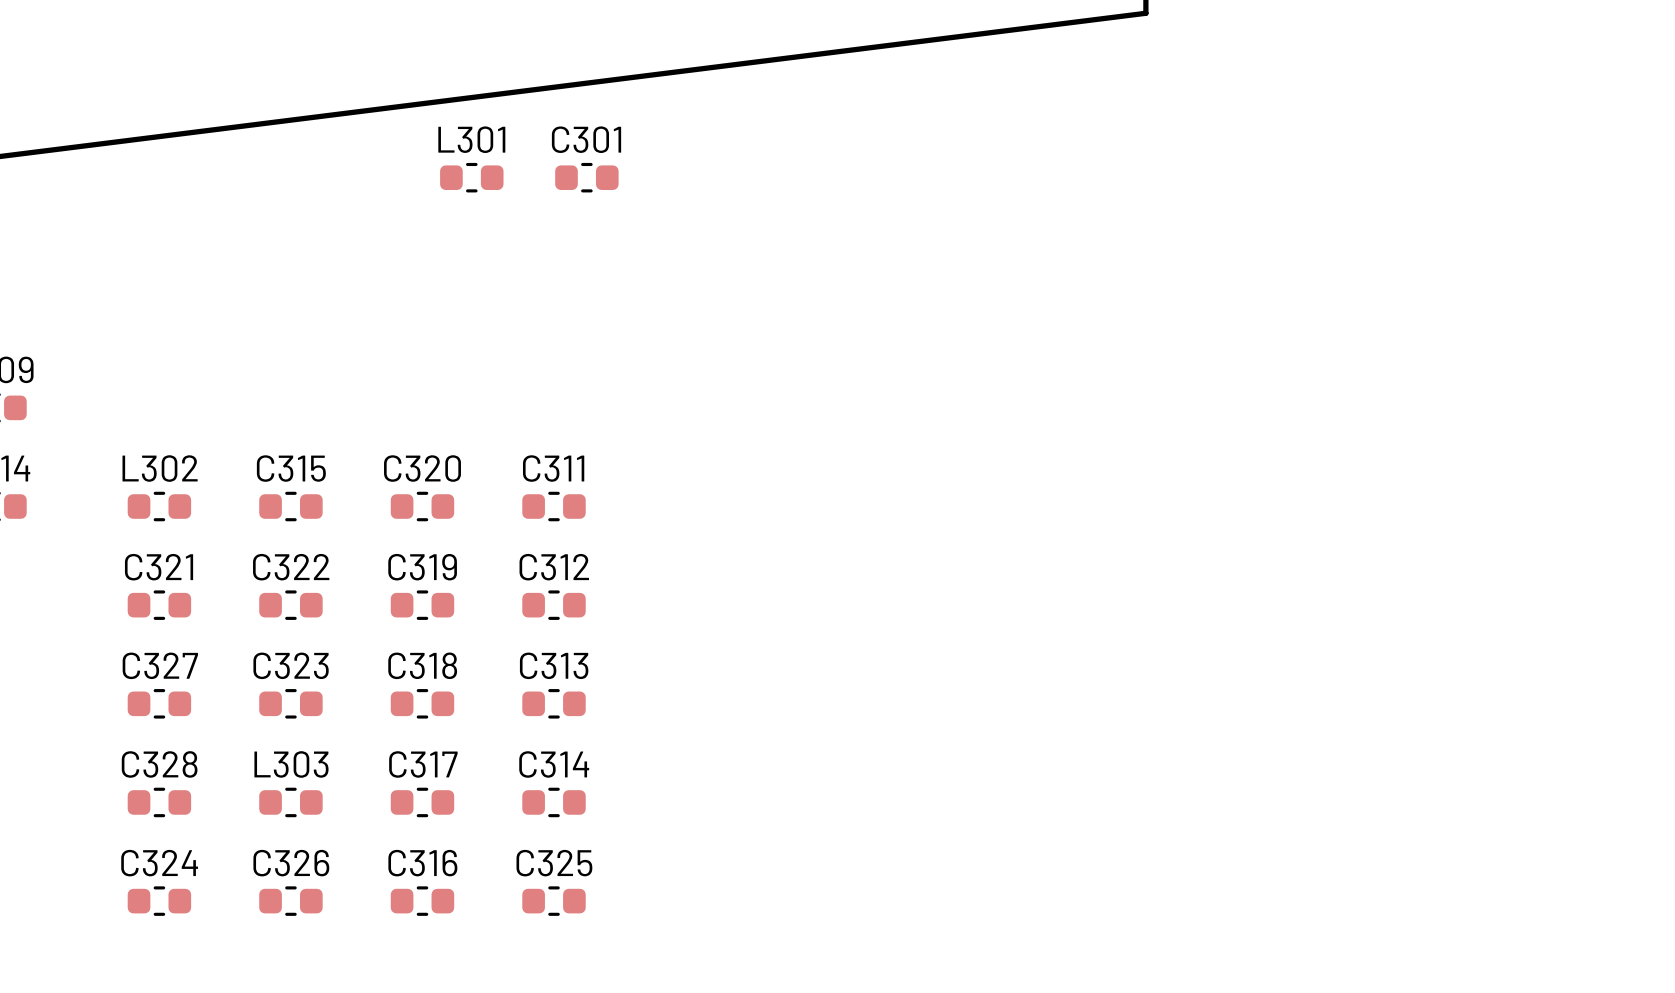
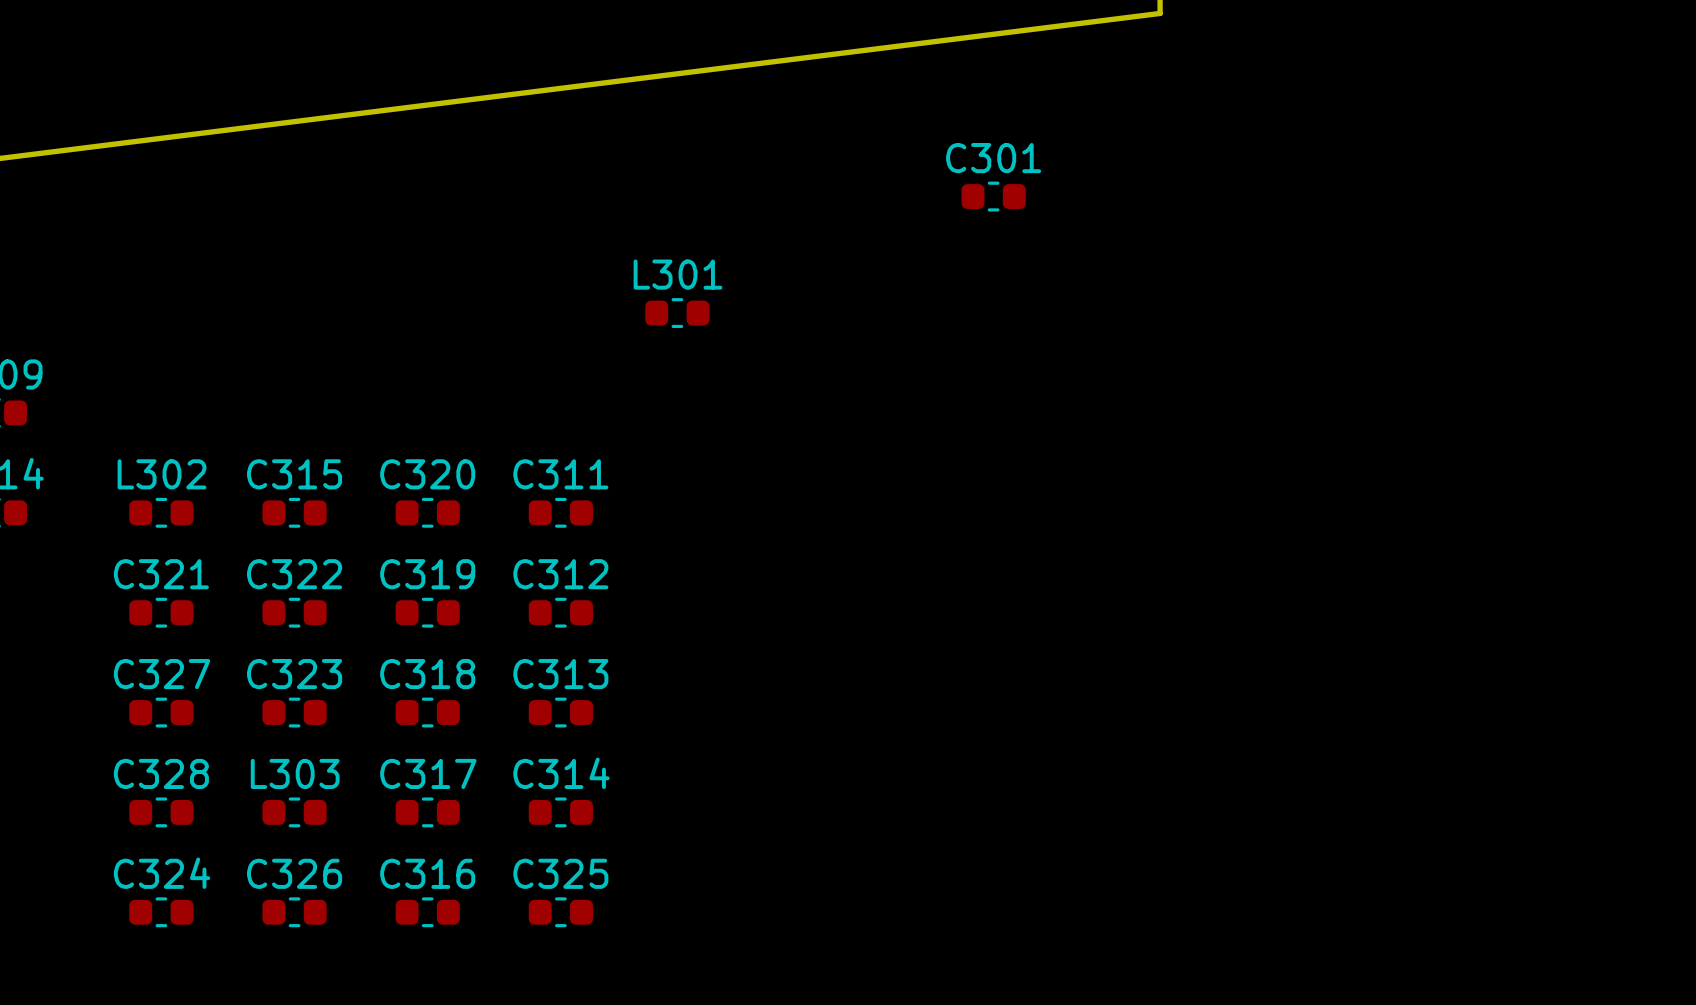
L301 position: (471, 177) -> (677, 313)
C301 position: (586, 177) -> (993, 196)

